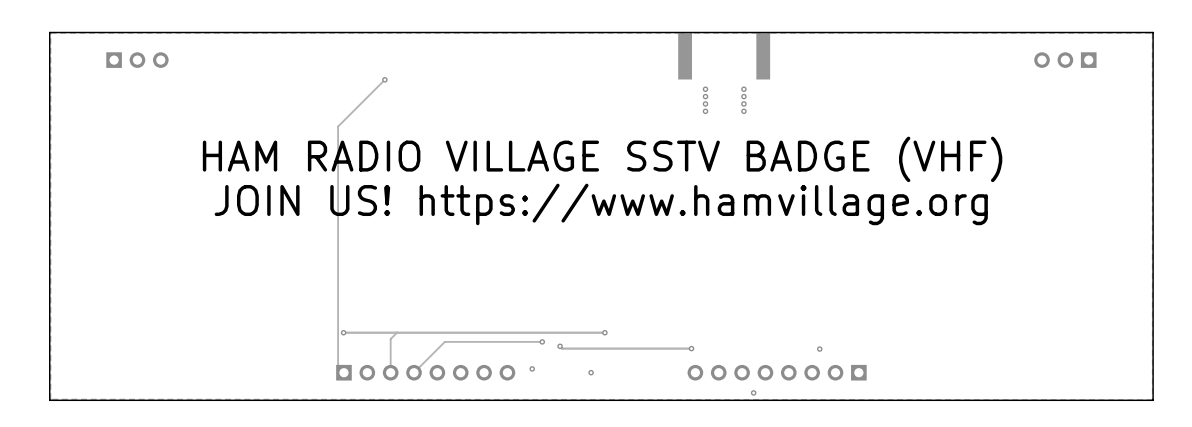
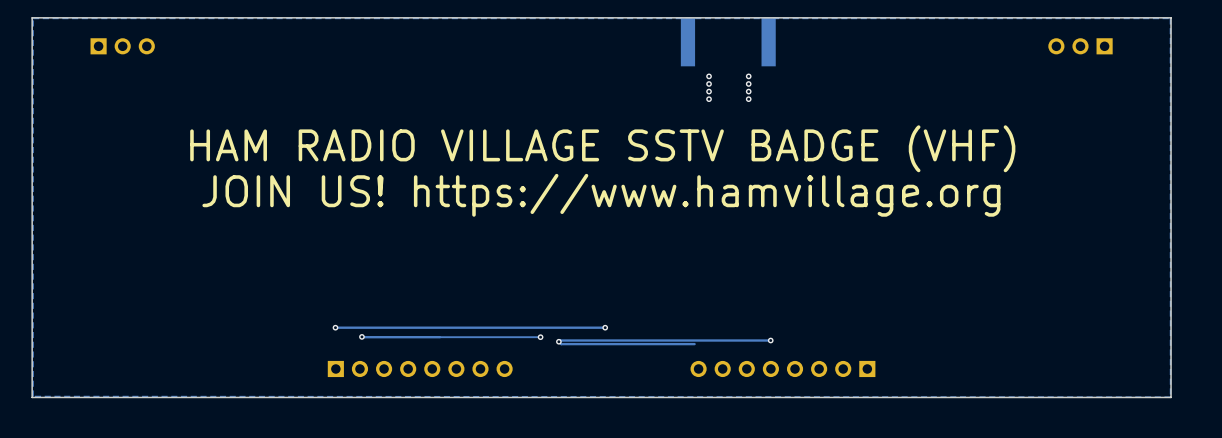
track: (384, 79) (338, 126) (338, 366) (343, 372) -> none
via: (384, 79) -> none
track: (397, 332) (390, 339) (390, 372) -> none
via: none -> (361, 336)
track: (444, 341) (414, 372) -> (439, 337) (361, 336)
track: none -> (770, 340) (560, 340)
via: none -> (770, 340)
via: (691, 348) -> none
via: (819, 349) -> none
via: (532, 368) -> none
via: (591, 372) -> none
via: (753, 392) -> none

